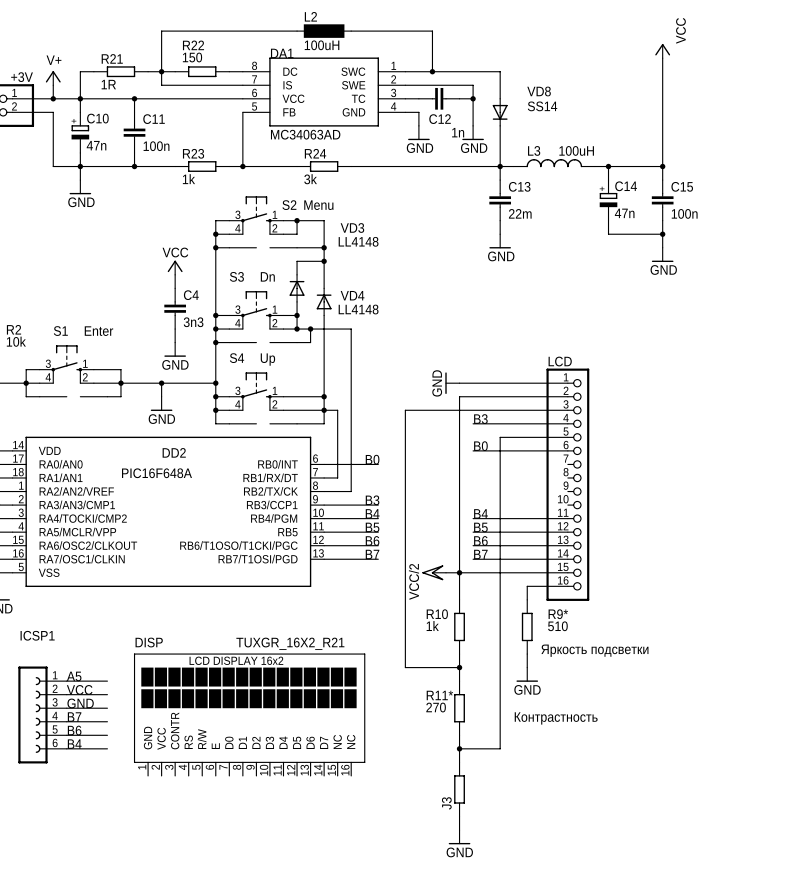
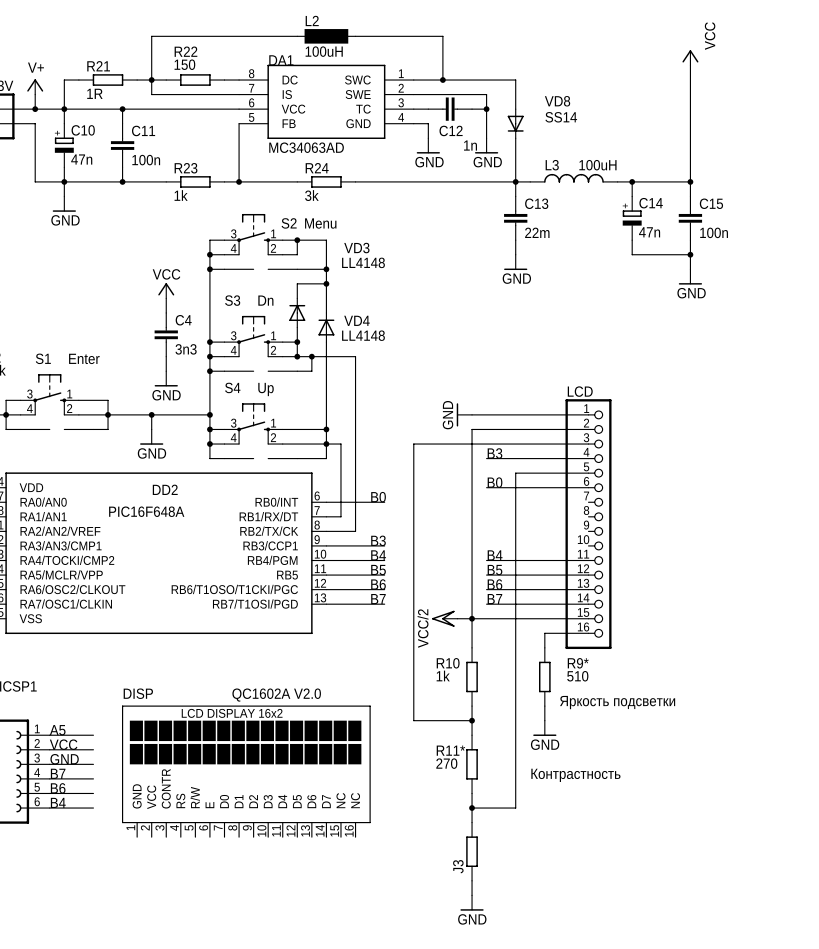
DISP value: TUXGR_16X2_R21 (290, 643) -> QC1602A V2.0 (276, 695)

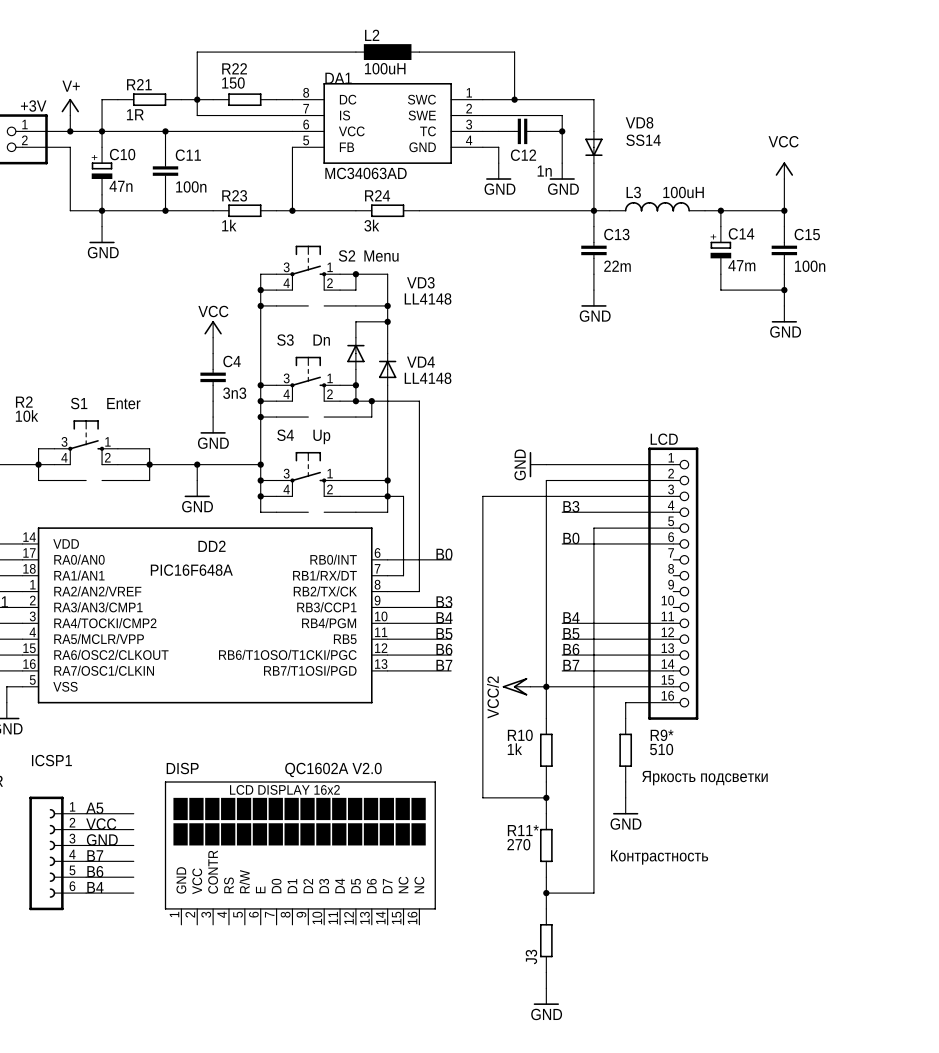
power symbol text rotation: 0° (710, 36) -> 90° clockwise (783, 141)
power symbol position: VCC (690, 57) -> VCC (784, 170)
wire: (690, 65) (690, 152) -> none
C14 value: 47n (649, 232) -> 47m (741, 265)

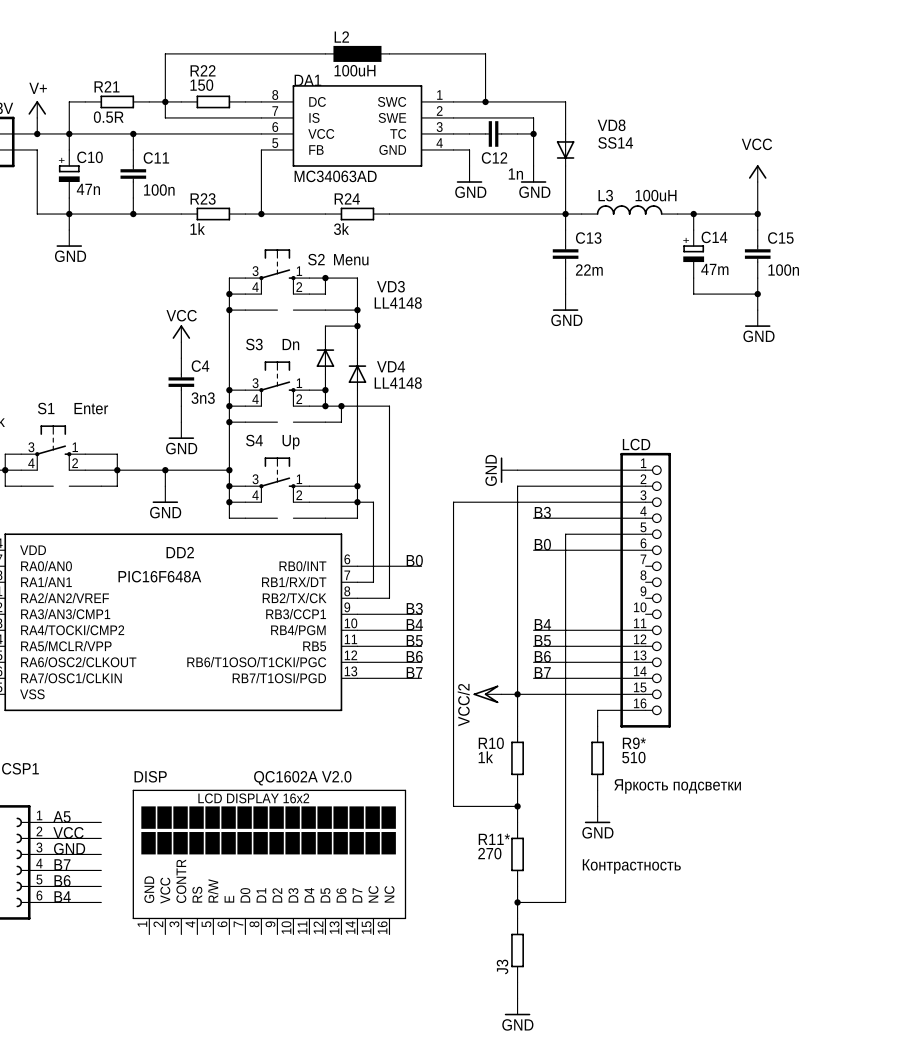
R21 value: 1R (135, 114) -> 0.5R (108, 117)

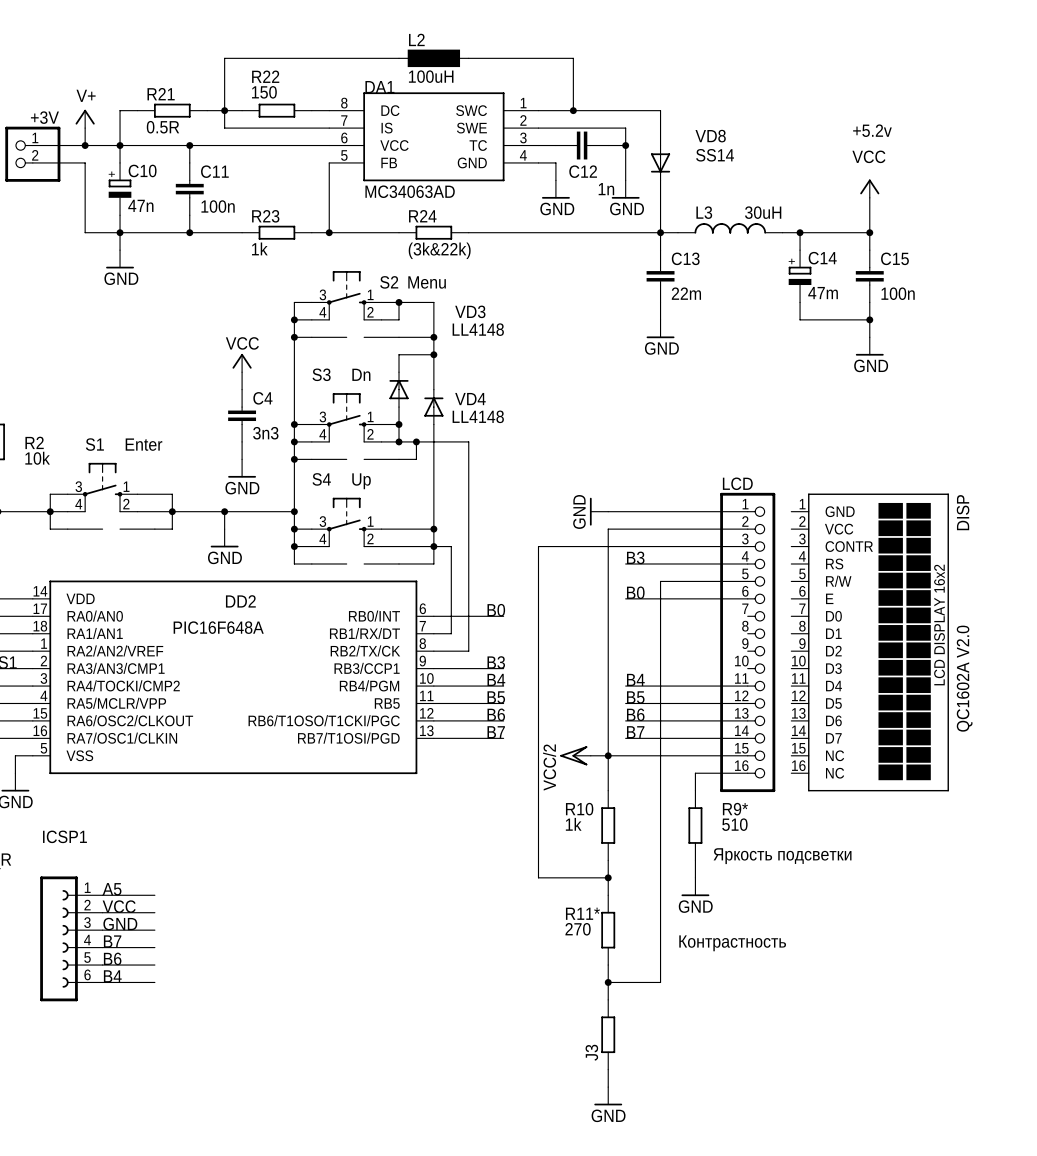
text: none -> +5.2v (872, 130)
L3 value: 100uH (656, 195) -> 30uH (763, 212)
R24 value: 3k (341, 229) -> (3k&22k) (439, 250)
DISP: none -> QC1602A V2.0 (870, 642)
DISP: QC1602A V2.0 (269, 862) -> none

